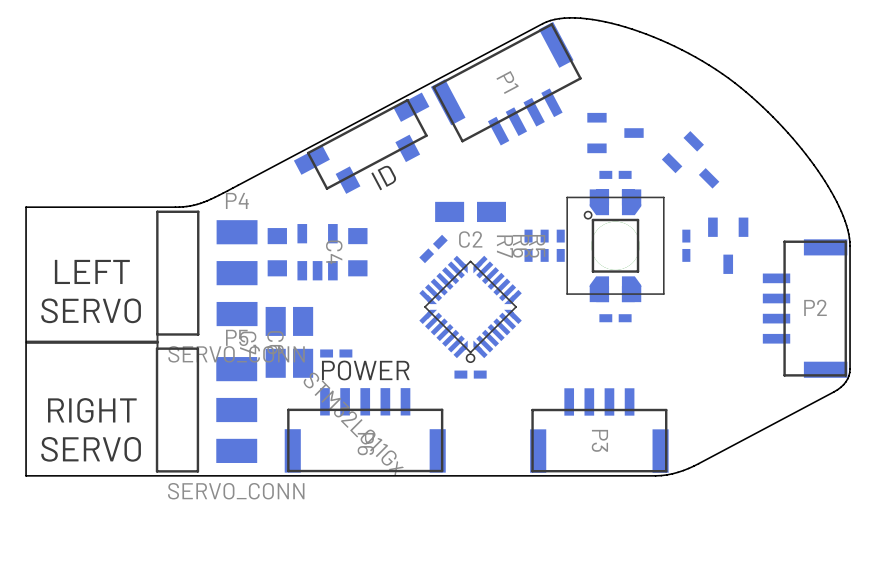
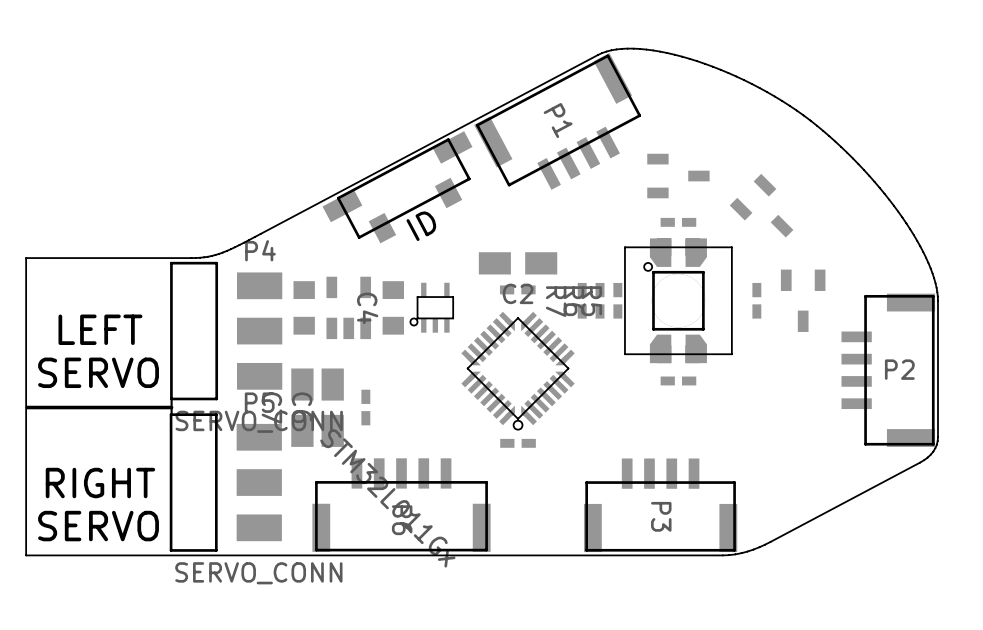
part: none -> (517, 289)
part: (433, 248) -> none
part: none -> (431, 307)
part rotation: 0° (336, 353) -> 90° clockwise (365, 407)
text: POWER (365, 370) -> none

